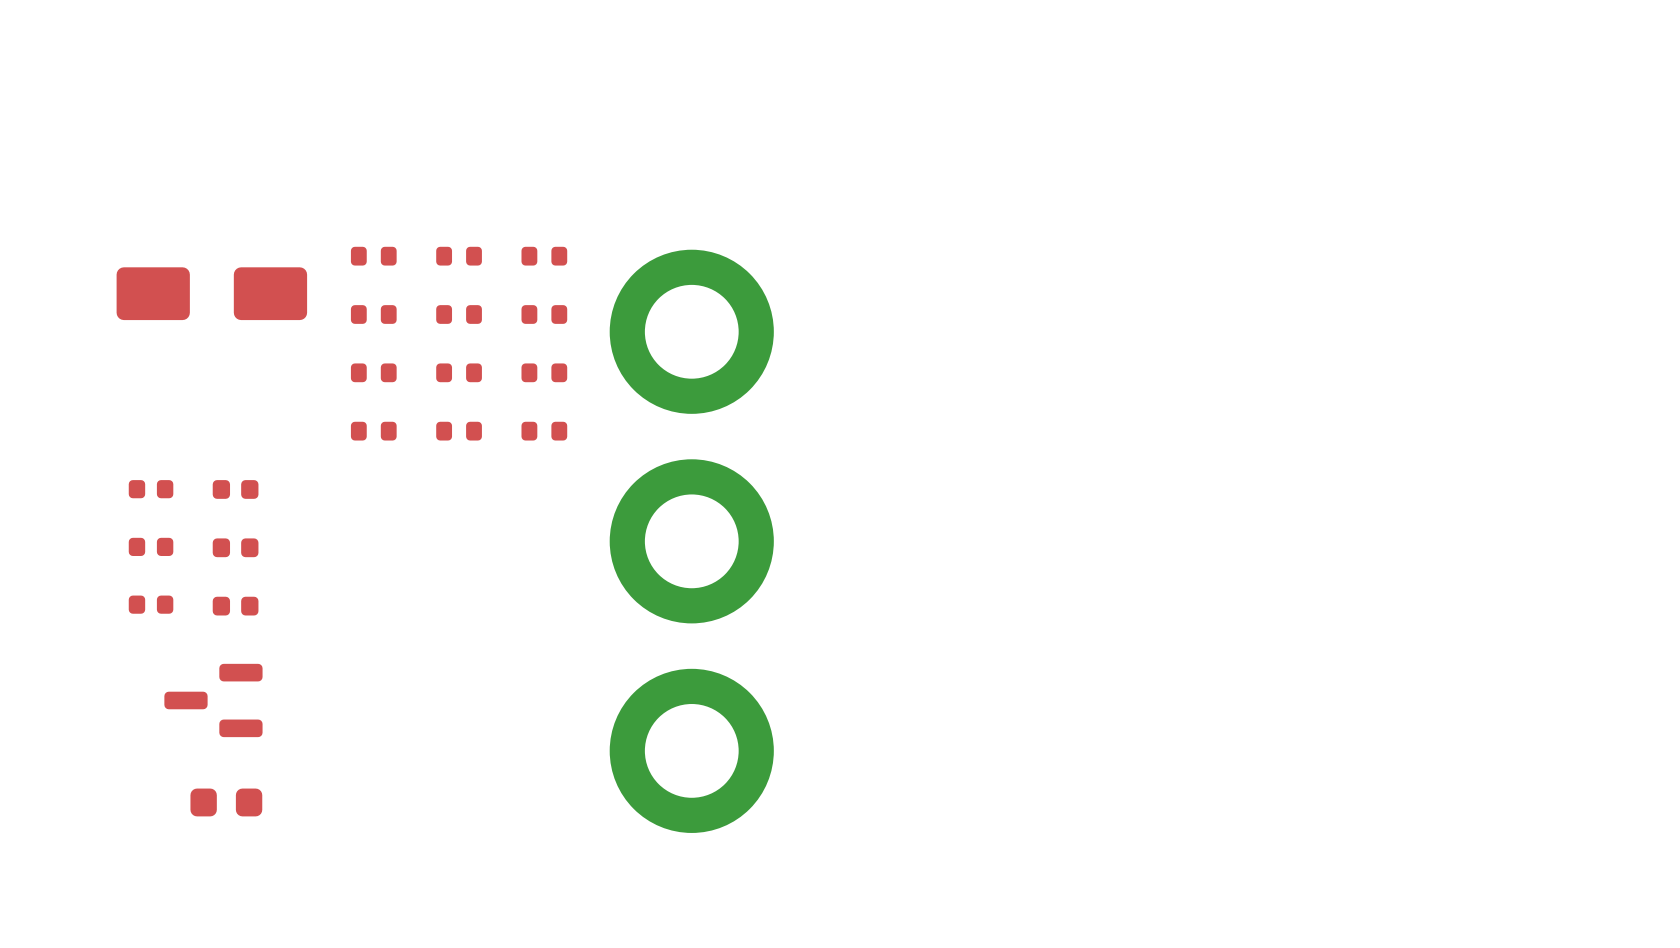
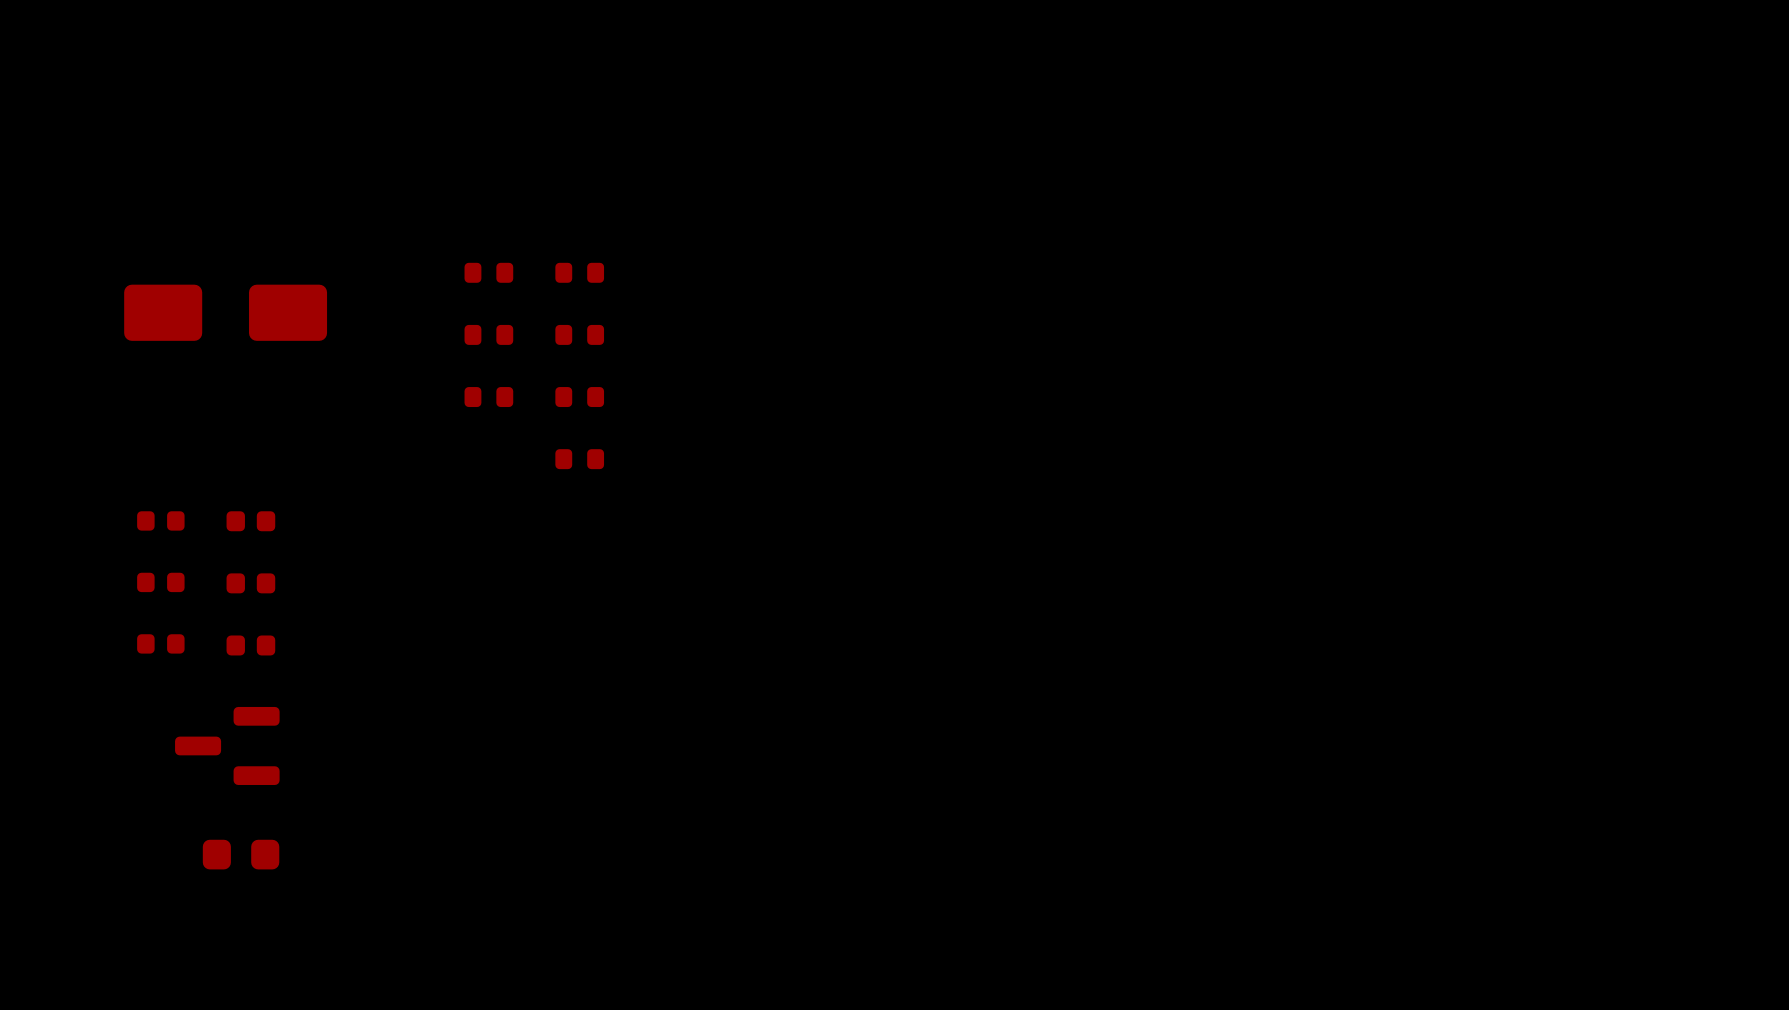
part: (373, 256) -> none
part: (373, 314) -> none
part: (691, 331) -> none
part: (373, 372) -> none
part: (373, 431) -> none
part: (459, 431) -> none
part: (691, 541) -> none
part: (691, 750) -> none

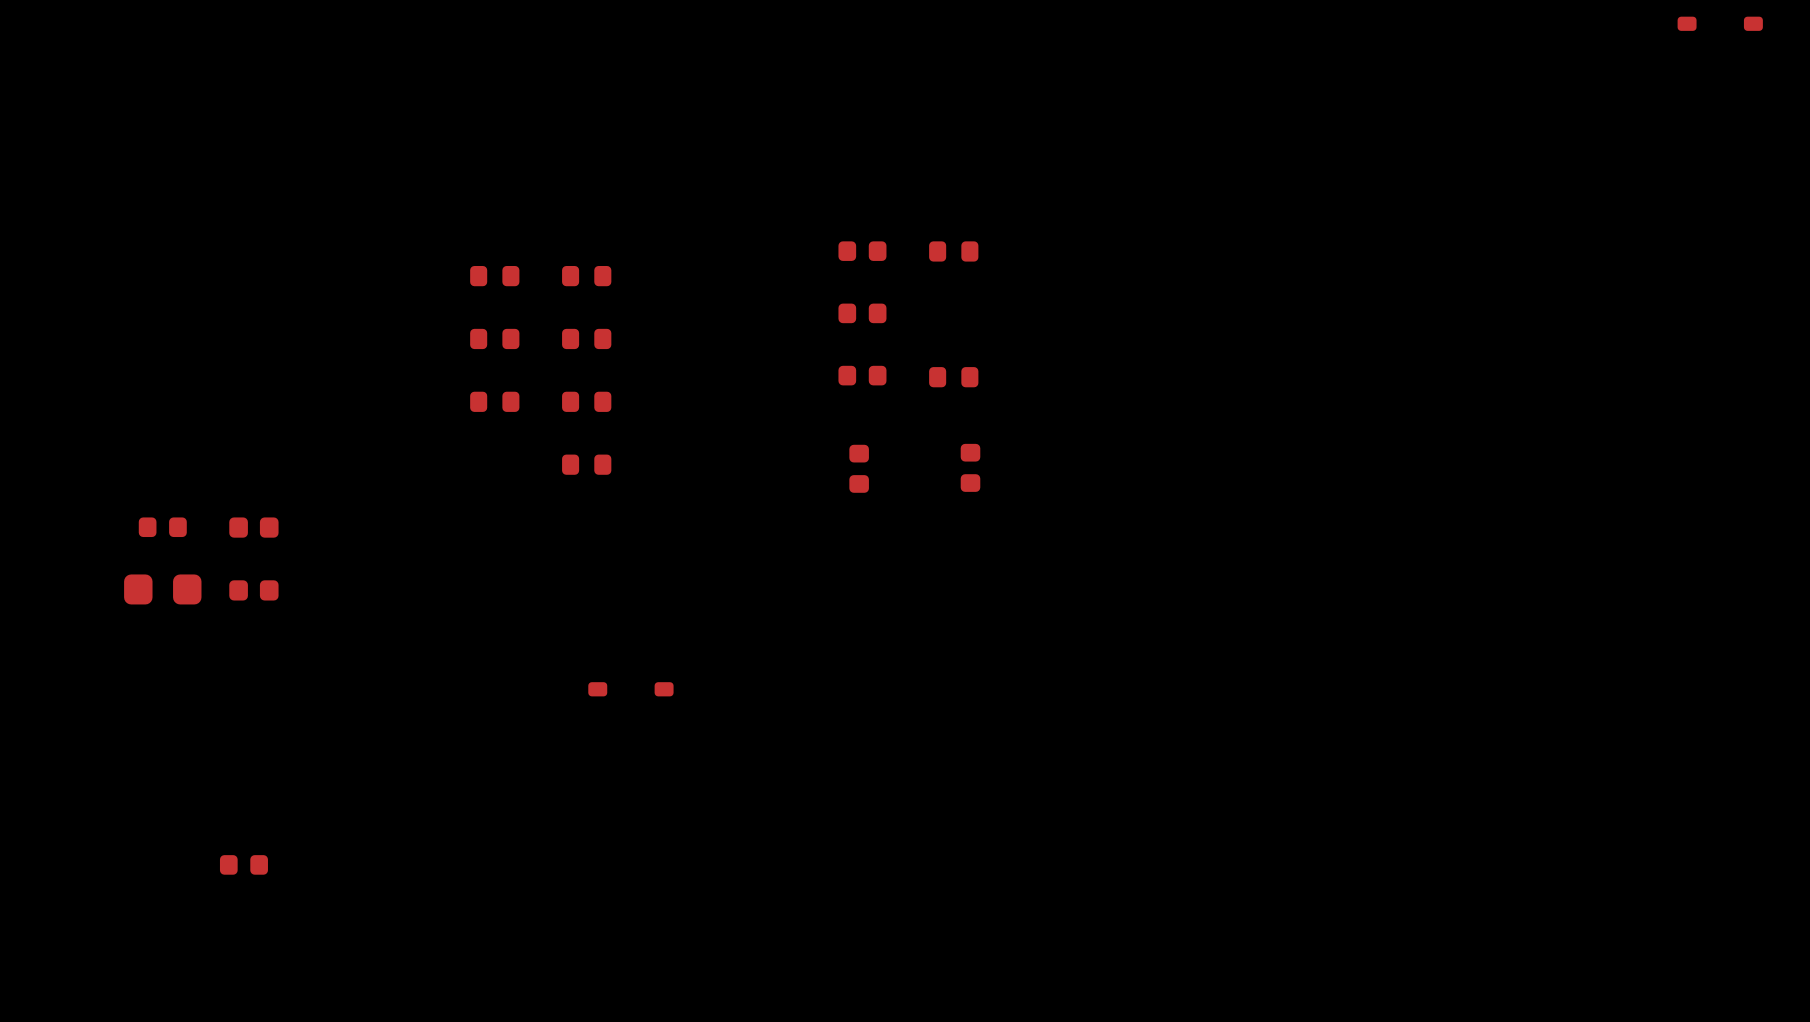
part: none -> (1720, 23)
part: none -> (862, 251)
part: none -> (953, 251)
part: none -> (862, 313)
part: (225, 312) -> none
part: none -> (862, 375)
part: none -> (953, 377)
part: none -> (970, 467)
part: none -> (859, 468)
part footprint: [137, 572, 185, 593] -> [124, 574, 202, 605]
part: (160, 643) -> none
part: (250, 645) -> none
part: none -> (630, 689)
part: (227, 745) -> none
part footprint: [202, 839, 280, 870] -> [219, 855, 268, 875]

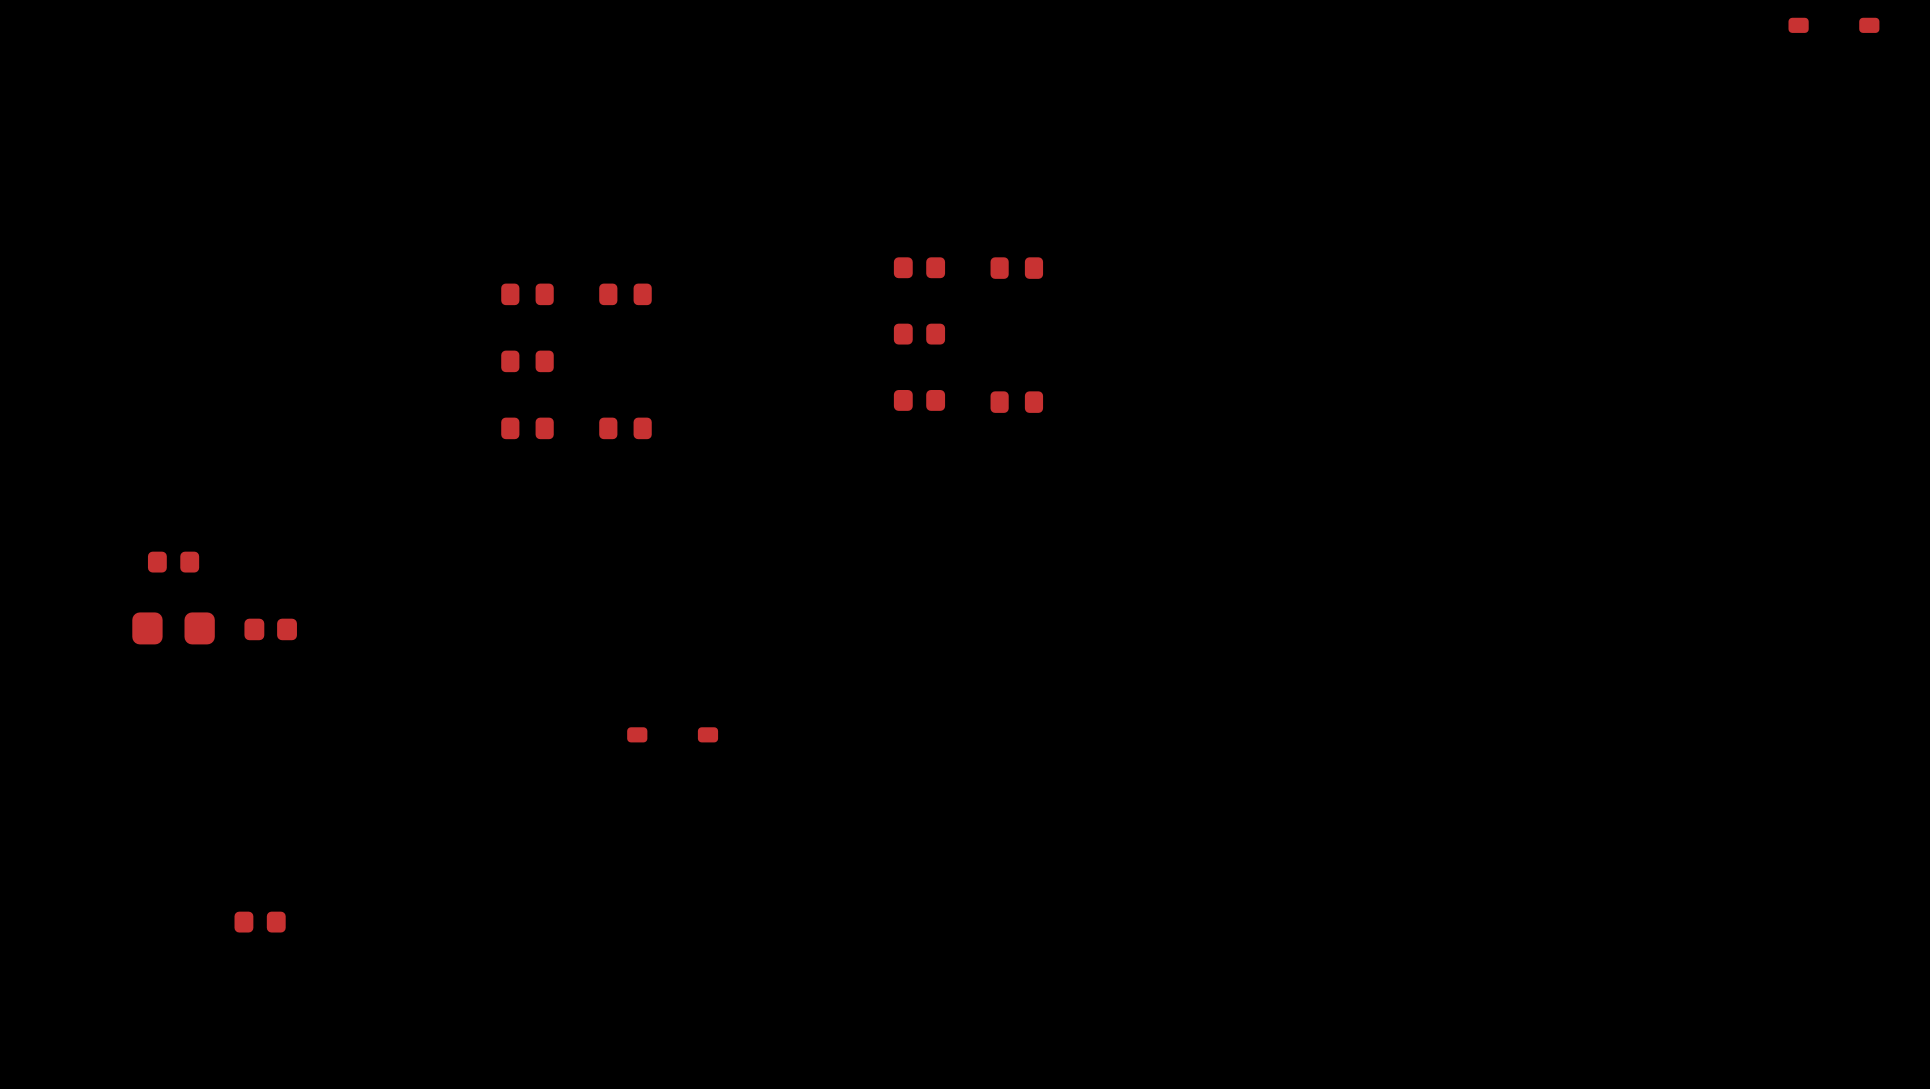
part: (586, 338) -> none
part: (586, 464) -> none
part: (970, 467) -> none
part: (859, 468) -> none
part: (253, 527) -> none

